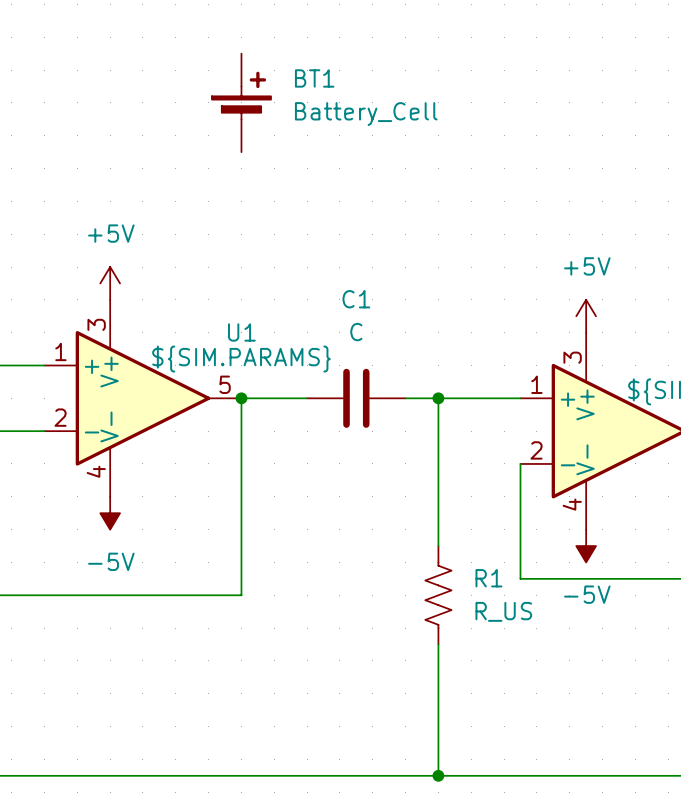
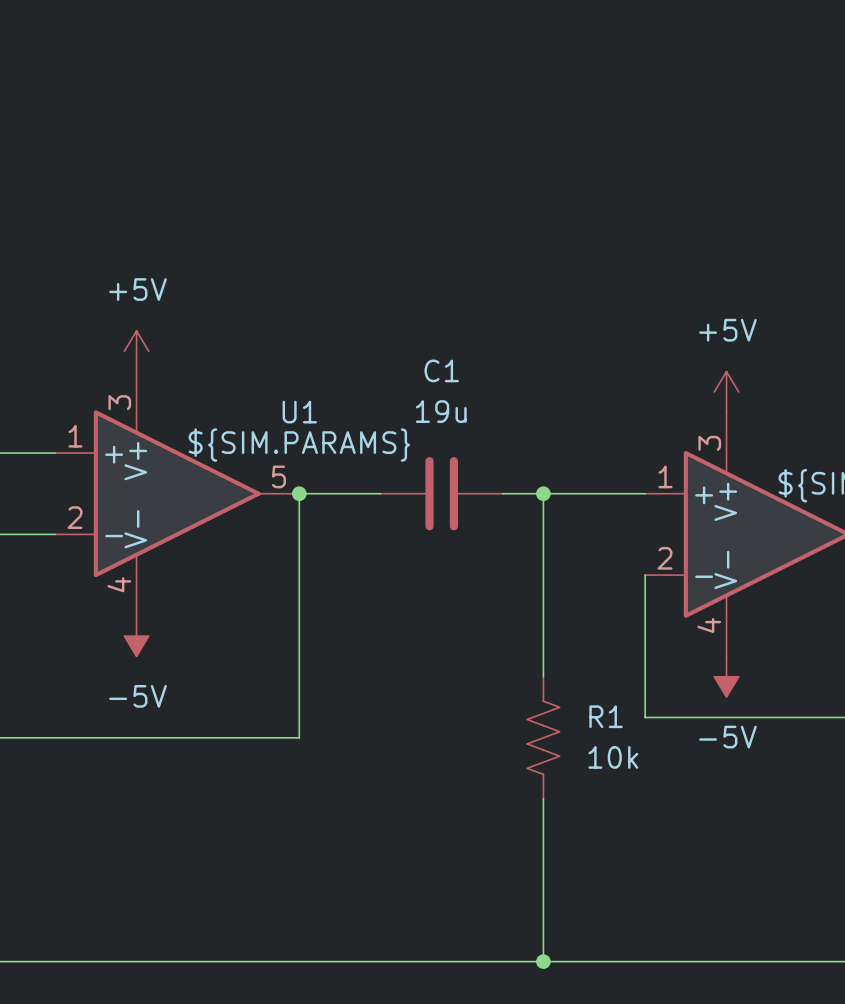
BT1: Battery_Cell (241, 102) -> none
C1 value: C (356, 332) -> 19u (441, 411)
R1 value: R_US (503, 611) -> 10k (613, 757)

